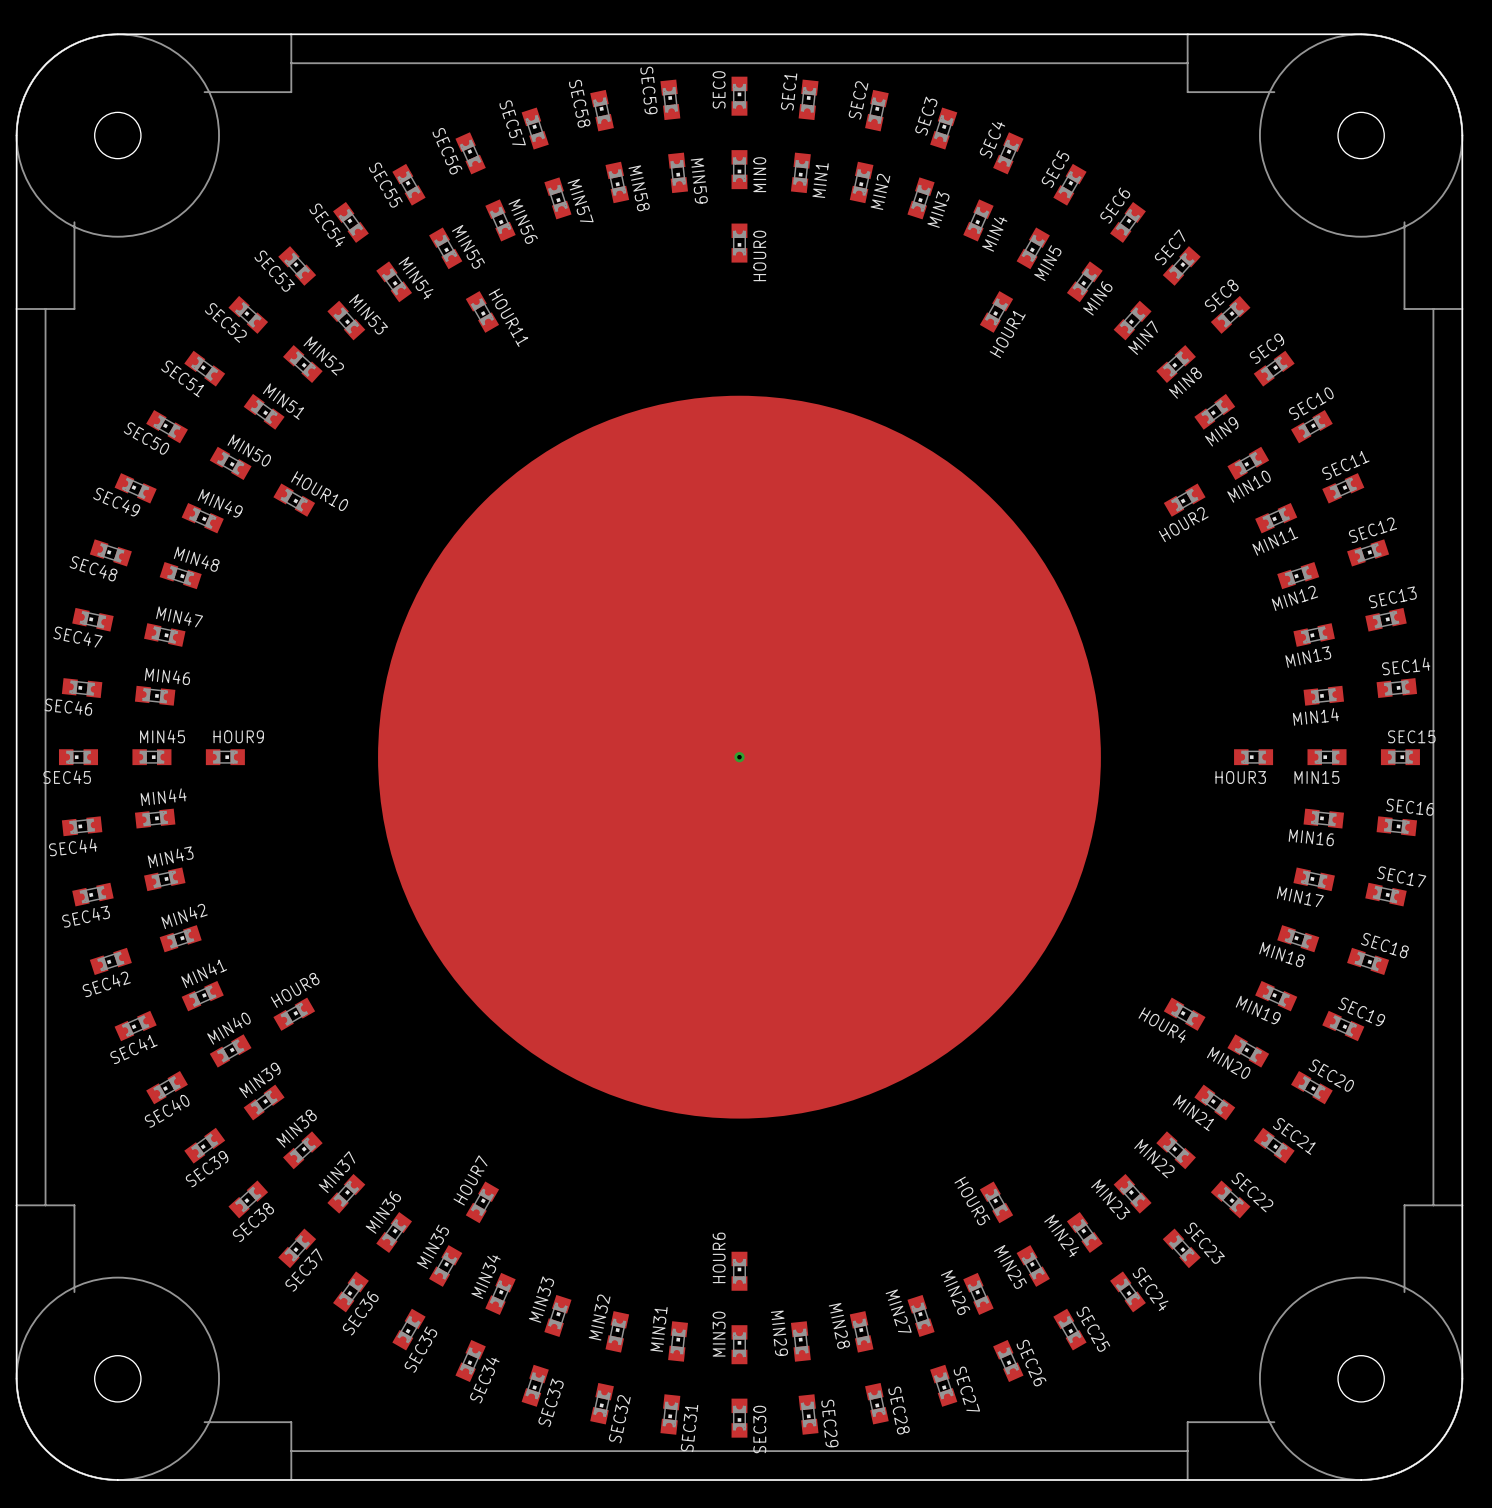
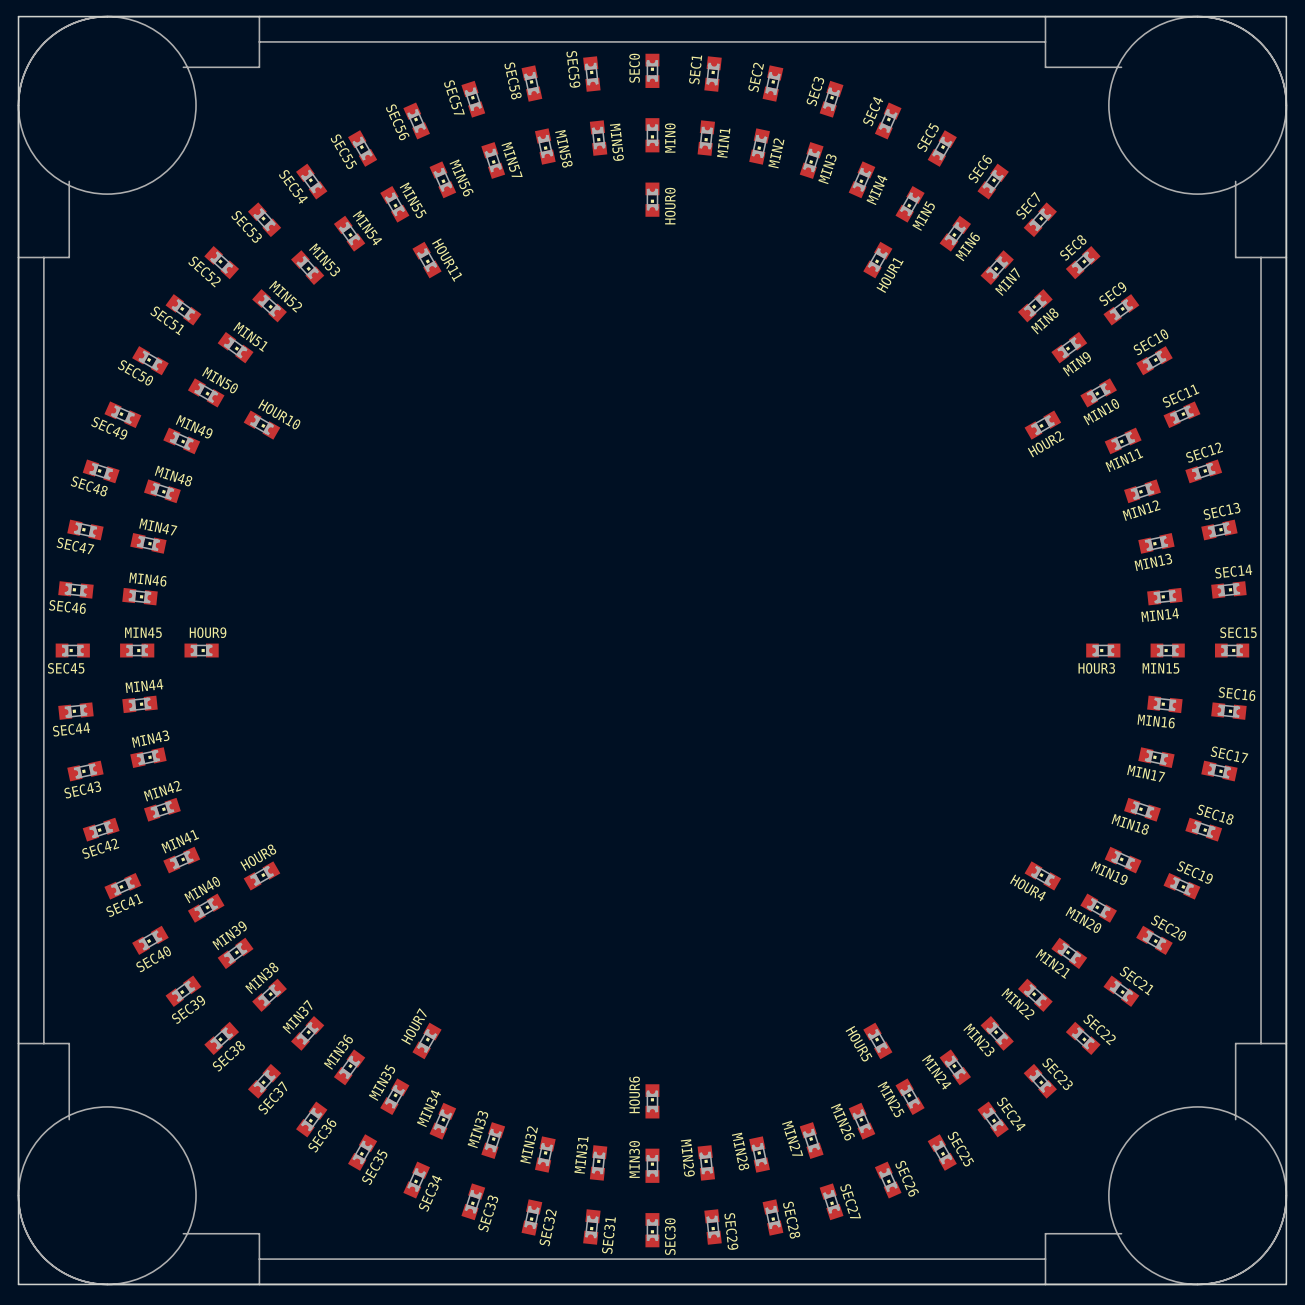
drawing: none -> [17, 15, 1288, 1286]
board edge: (117, 34) (98, 36) (79, 42) (61, 51) (46, 63) (33, 79) (24, 96) (18, 115) (16, 135) -> (107, 16) (18, 16) (18, 105)
board edge: (1361, 34) (1380, 36) (1399, 42) (1417, 51) (1432, 63) (1445, 79) (1454, 96) (1460, 115) (1462, 135) -> (1197, 16) (1286, 16) (1286, 105)
part: (739, 757) -> none
part: (739, 757) -> none
board edge: (16, 1378) (18, 1398) (24, 1417) (33, 1435) (46, 1450) (61, 1462) (79, 1472) (98, 1478) (117, 1480) -> (18, 1195) (18, 1284) (107, 1284)
board edge: (1462, 1378) (1460, 1398) (1454, 1417) (1445, 1435) (1432, 1450) (1417, 1462) (1399, 1472) (1380, 1478) (1361, 1480) -> (1286, 1195) (1286, 1284) (1197, 1284)

